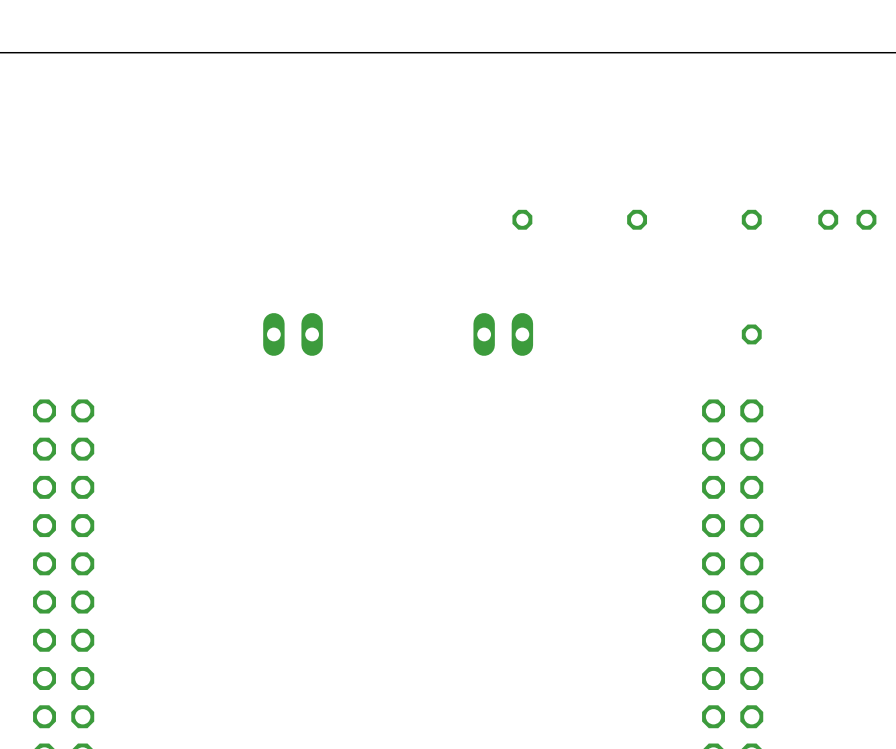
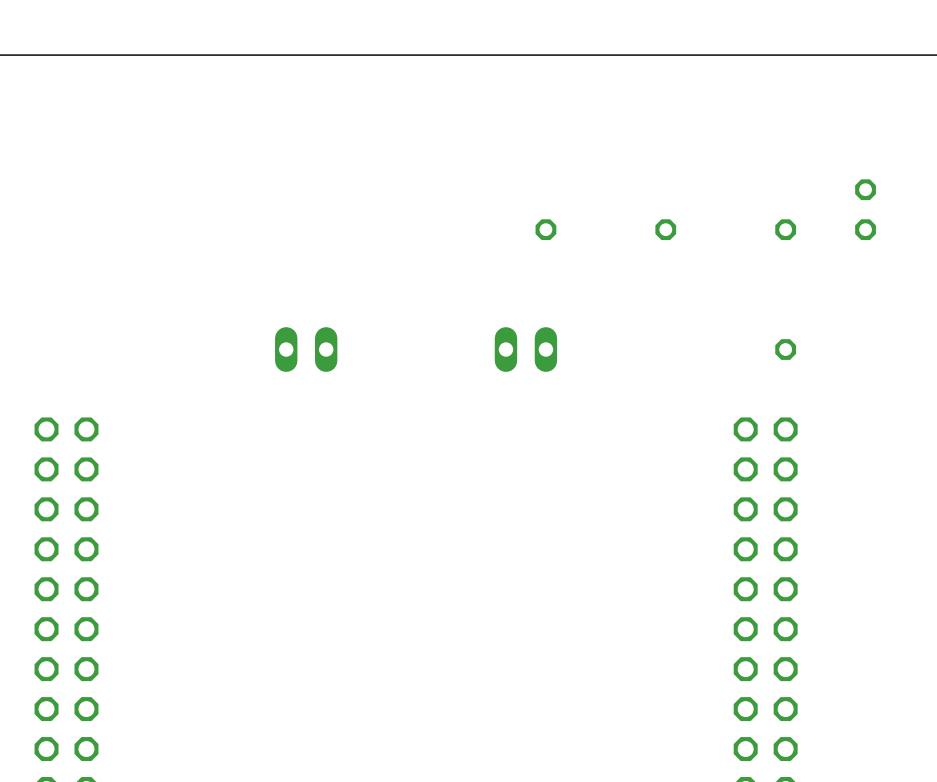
part rotation: 0° (847, 219) -> 90° clockwise (865, 209)

